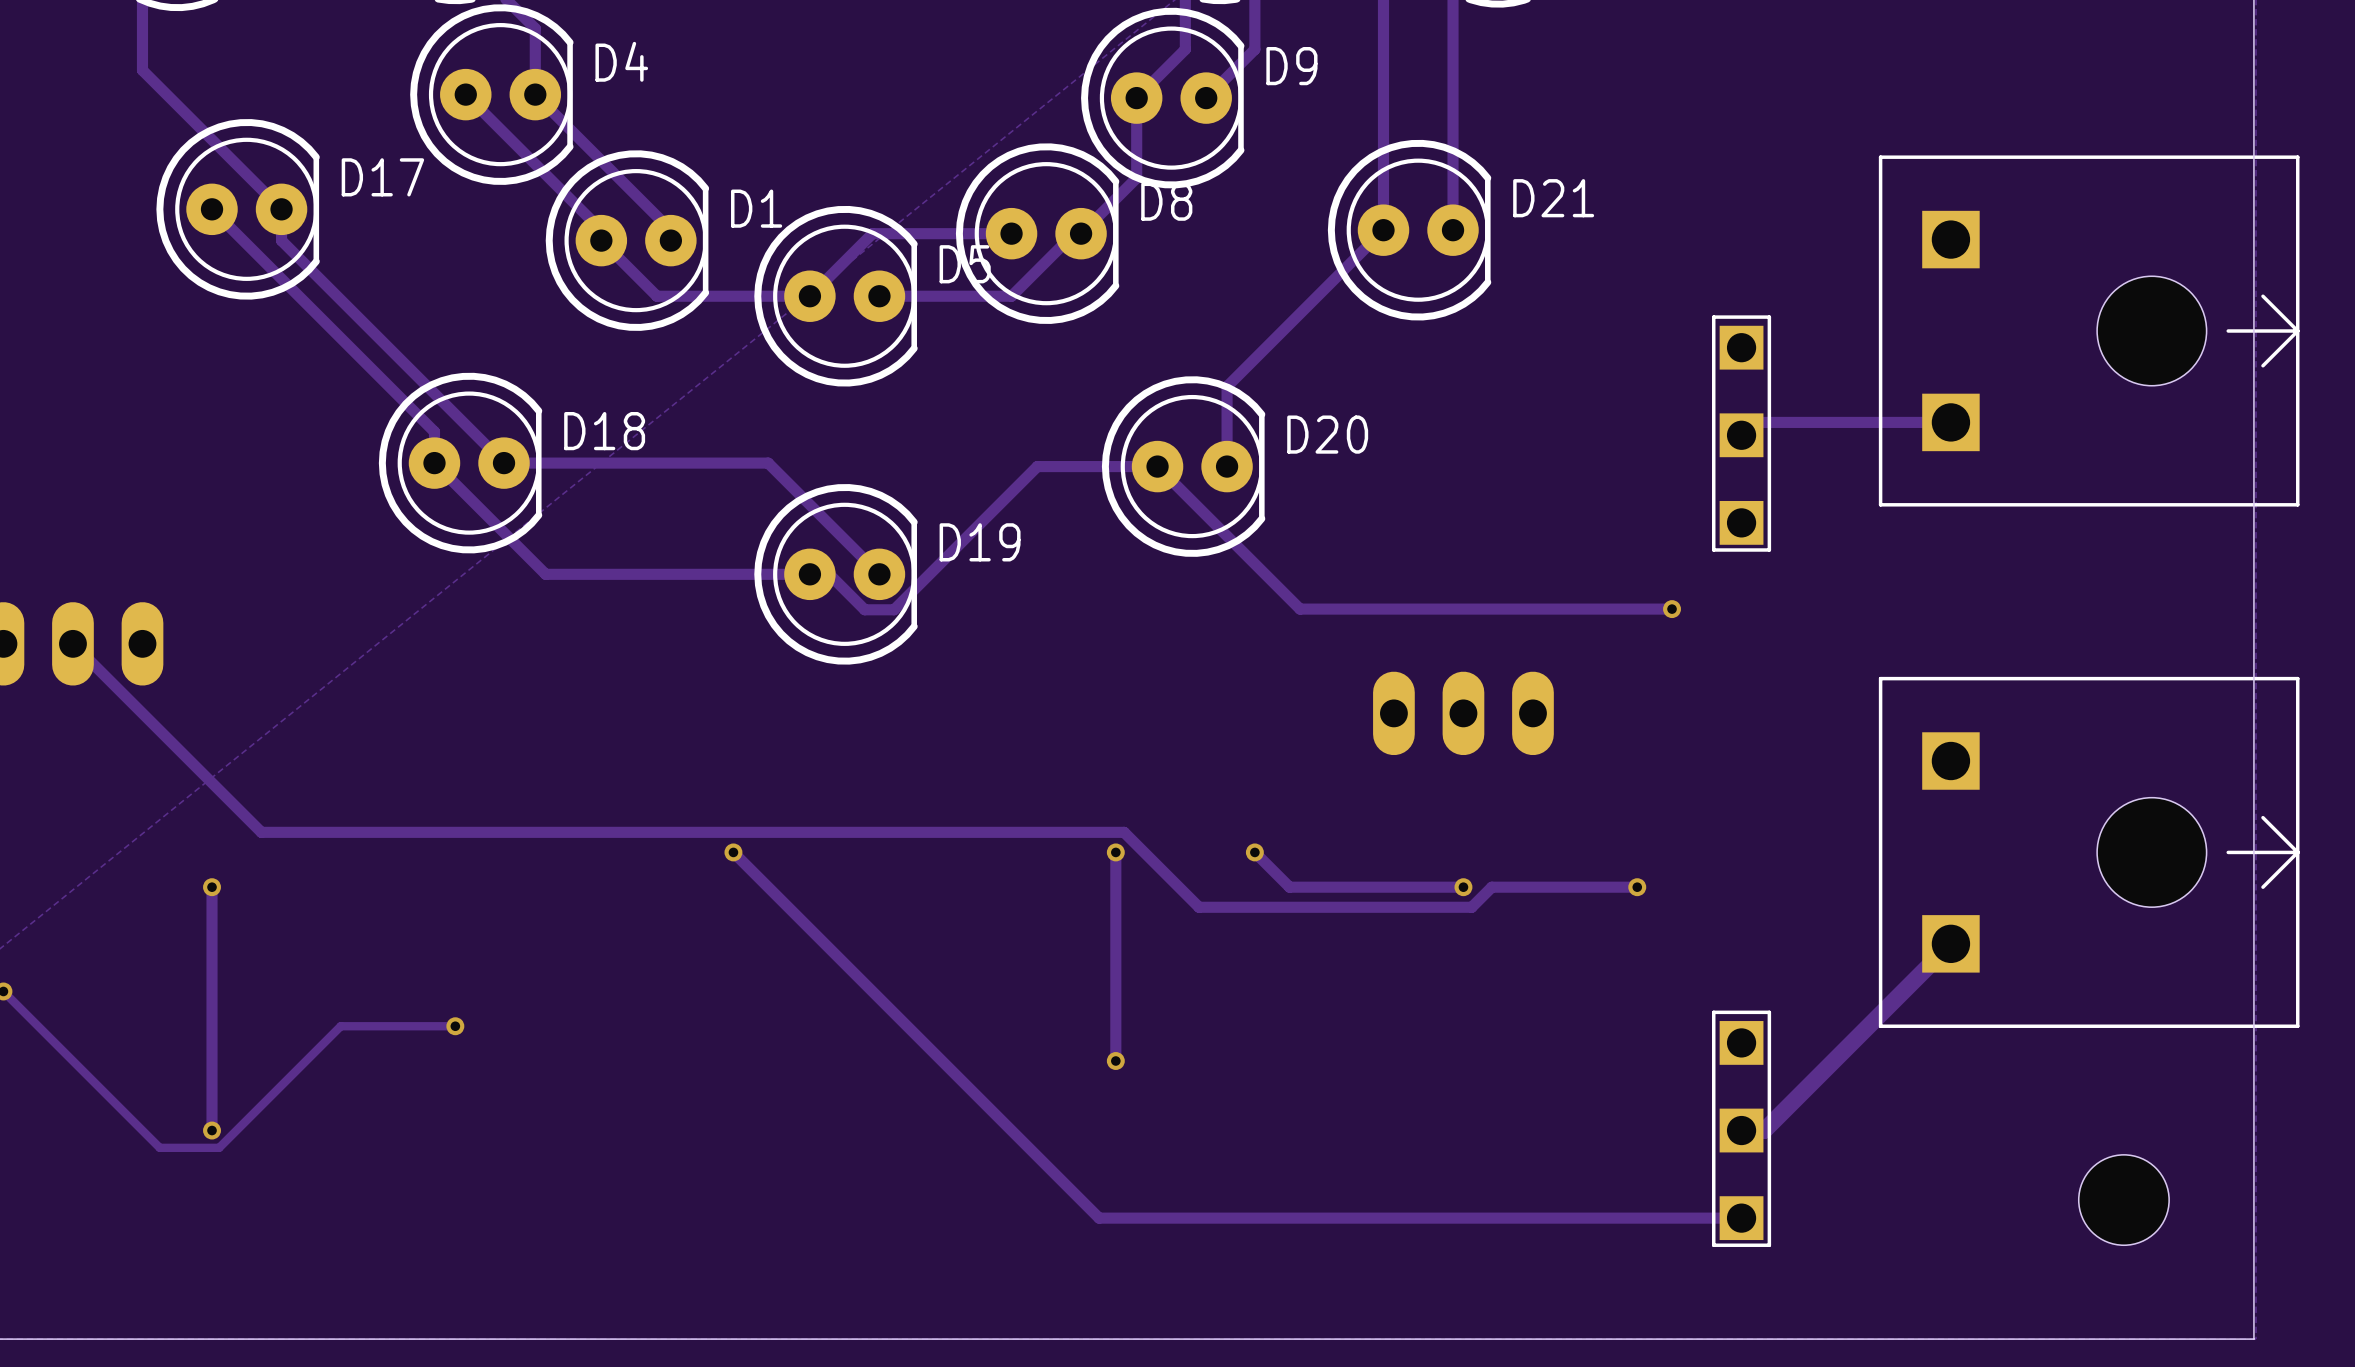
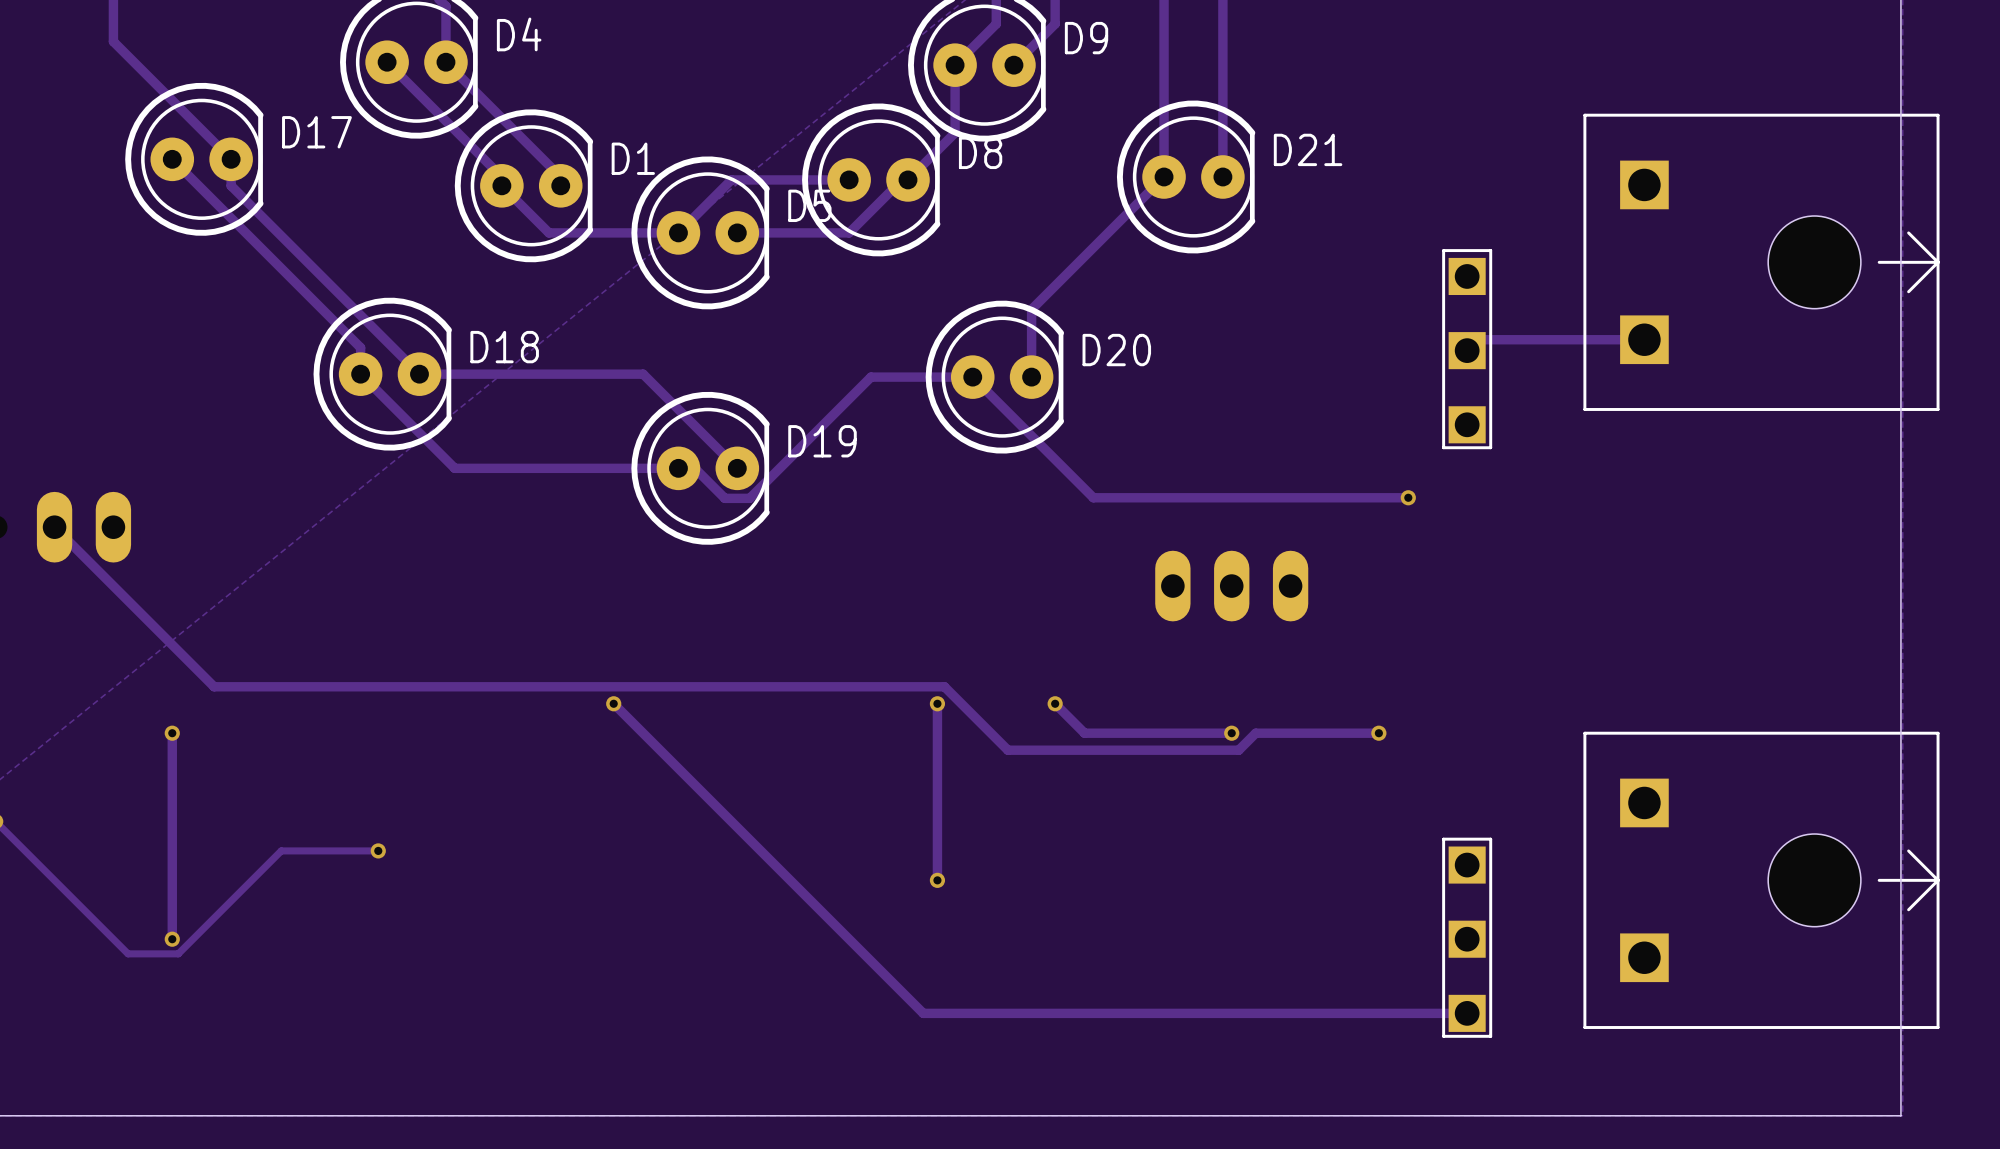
part position: (2089, 852) -> (1761, 880)
track: (1950, 943) (1764, 1130) (1741, 1130) -> none
part: (2123, 1200) -> none

